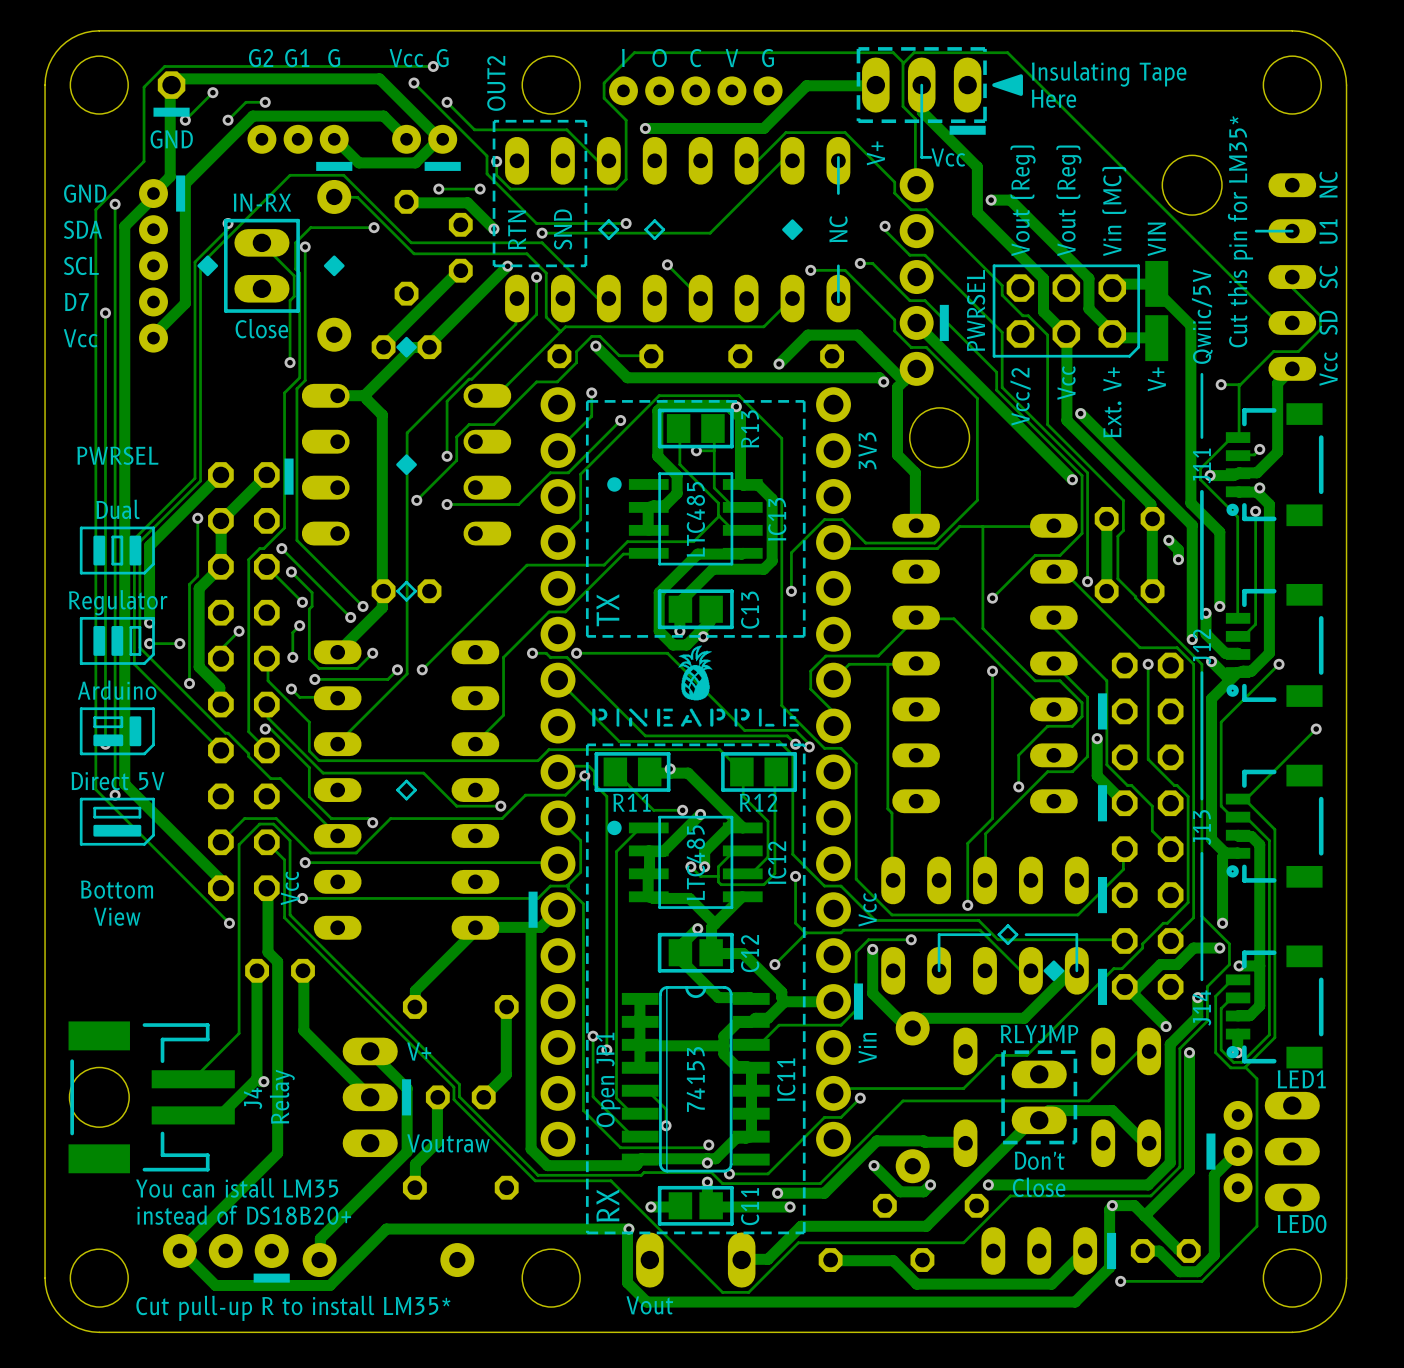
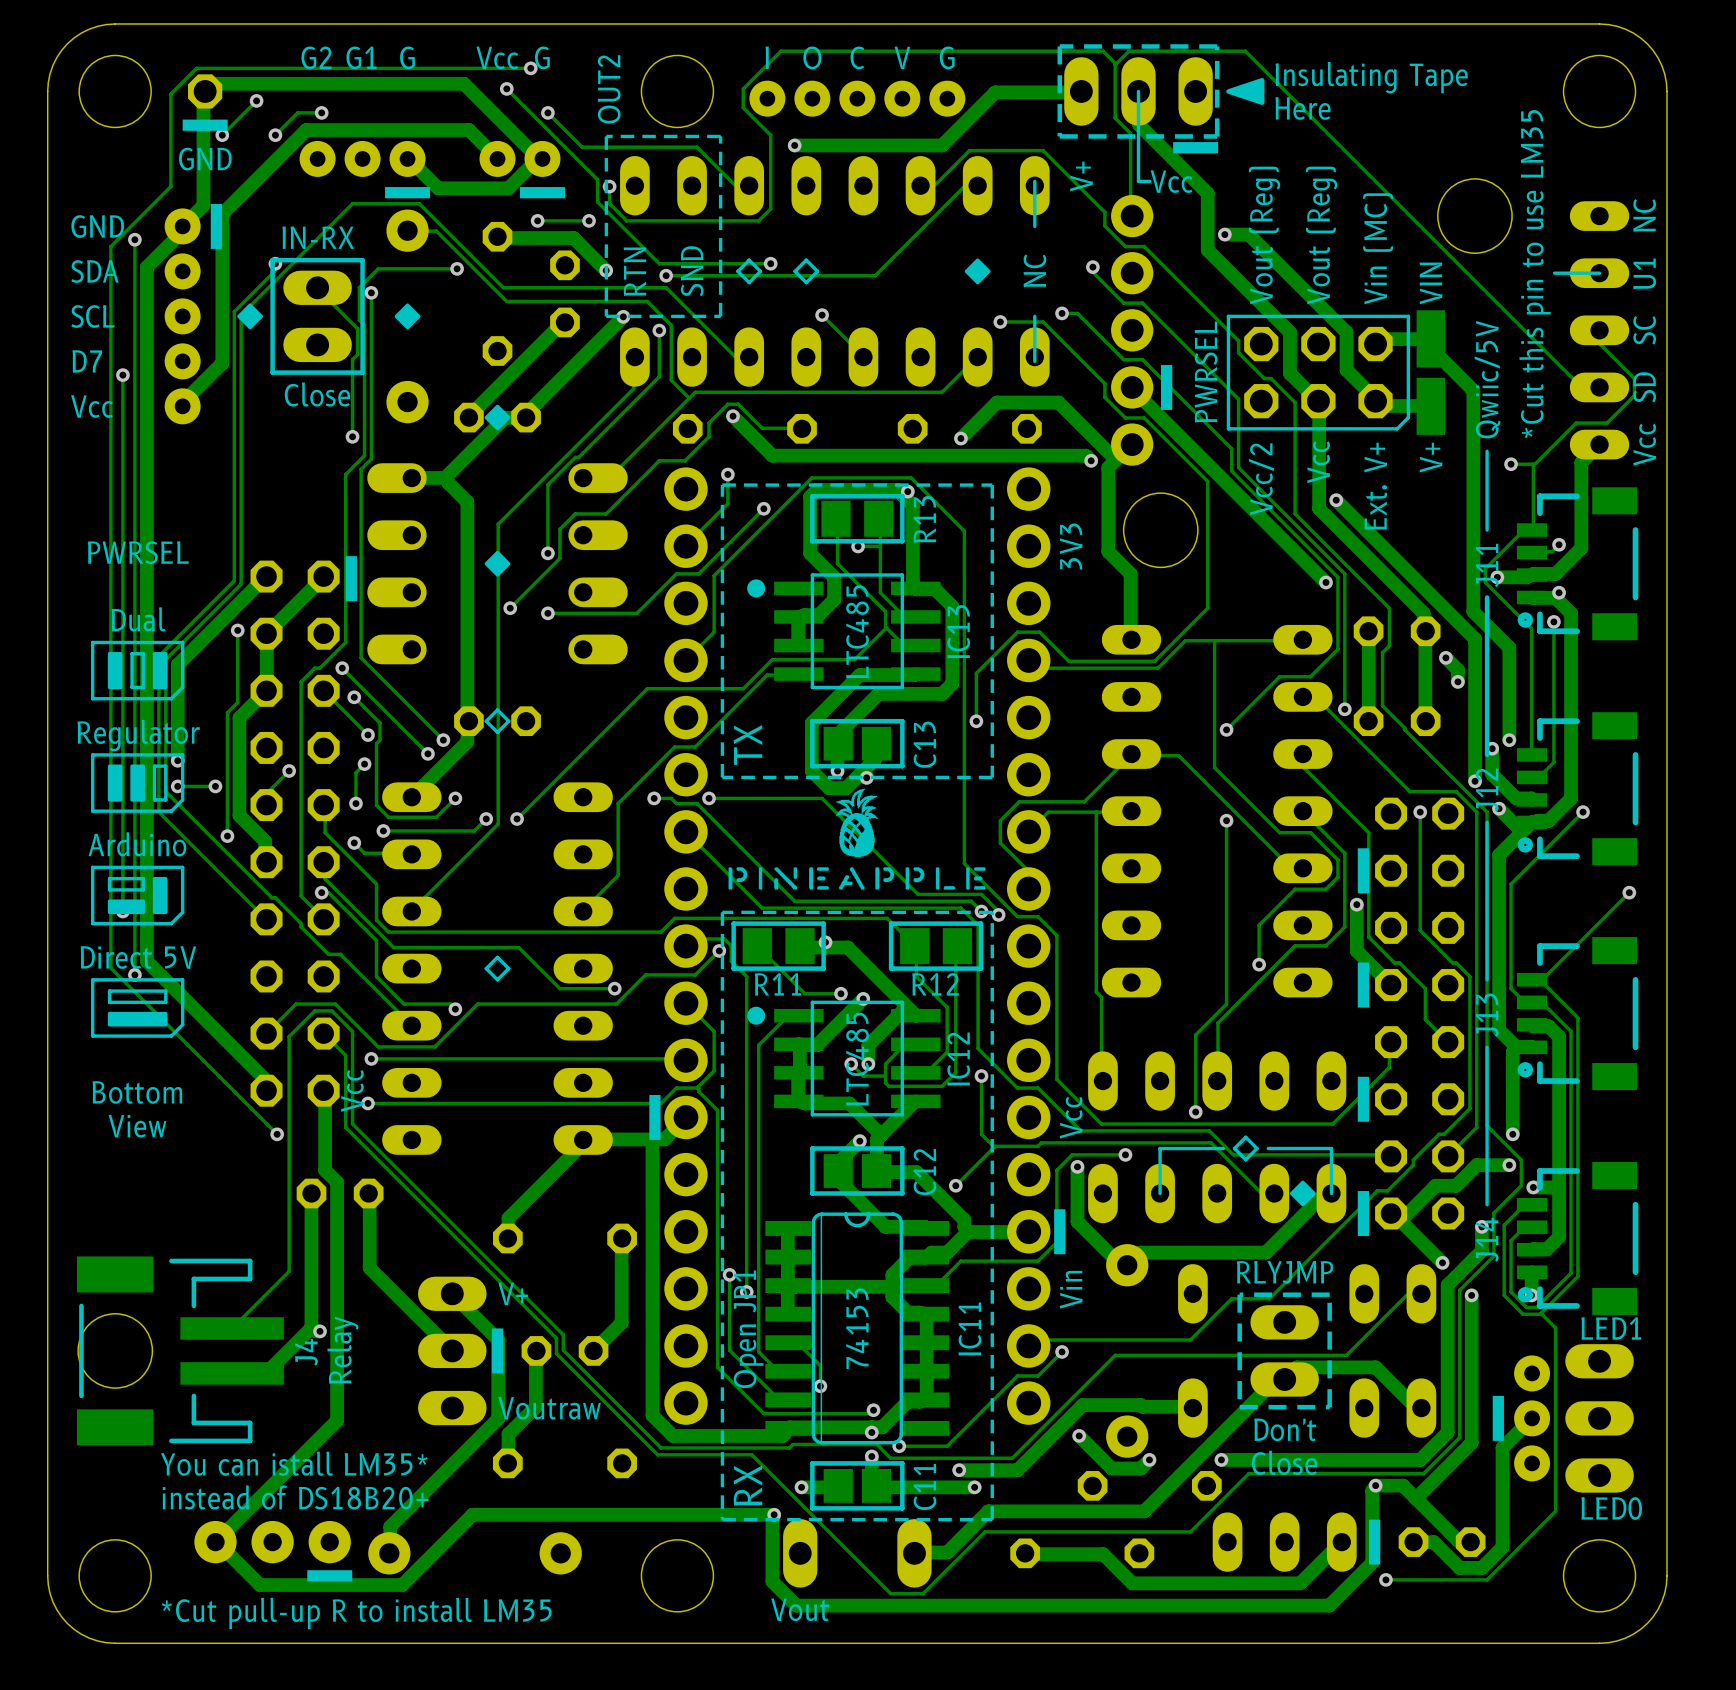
text: Cut this pin for LM35* (1240, 231) -> *Cut this pin to use LM35 (1535, 274)
text: You can istall LM35 (237, 1187) -> You can istall LM35* (294, 1463)
text: Cut pull-up R to install LM35* (293, 1308) -> *Cut pull-up R to install LM35 (356, 1613)

